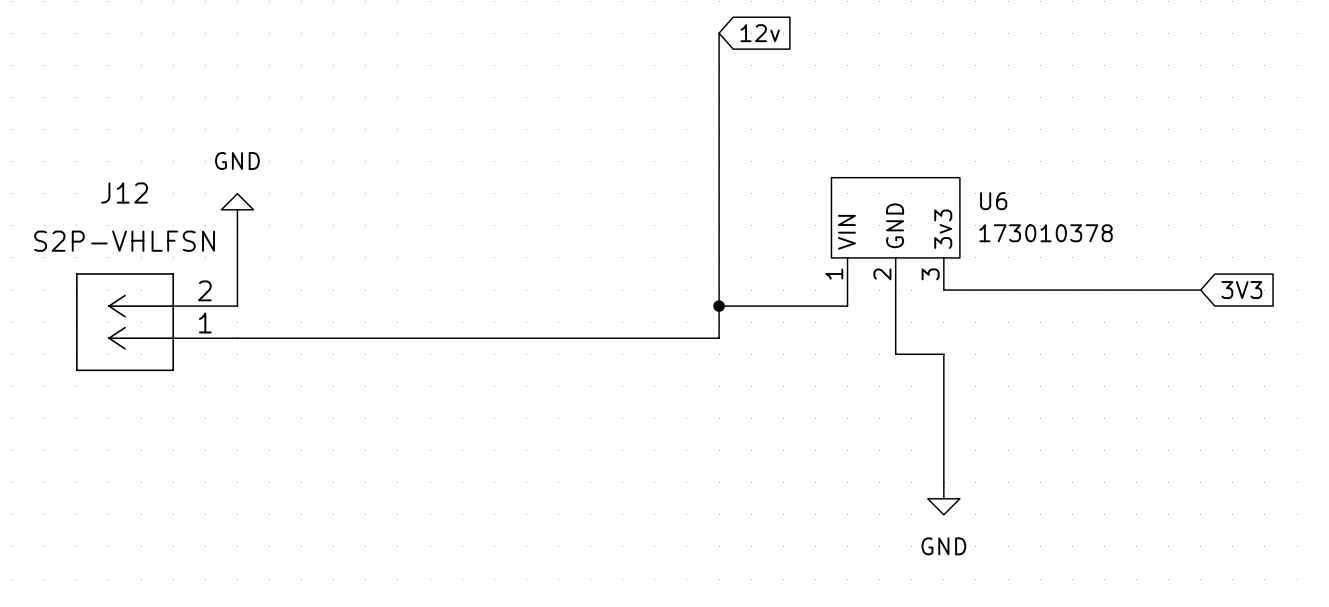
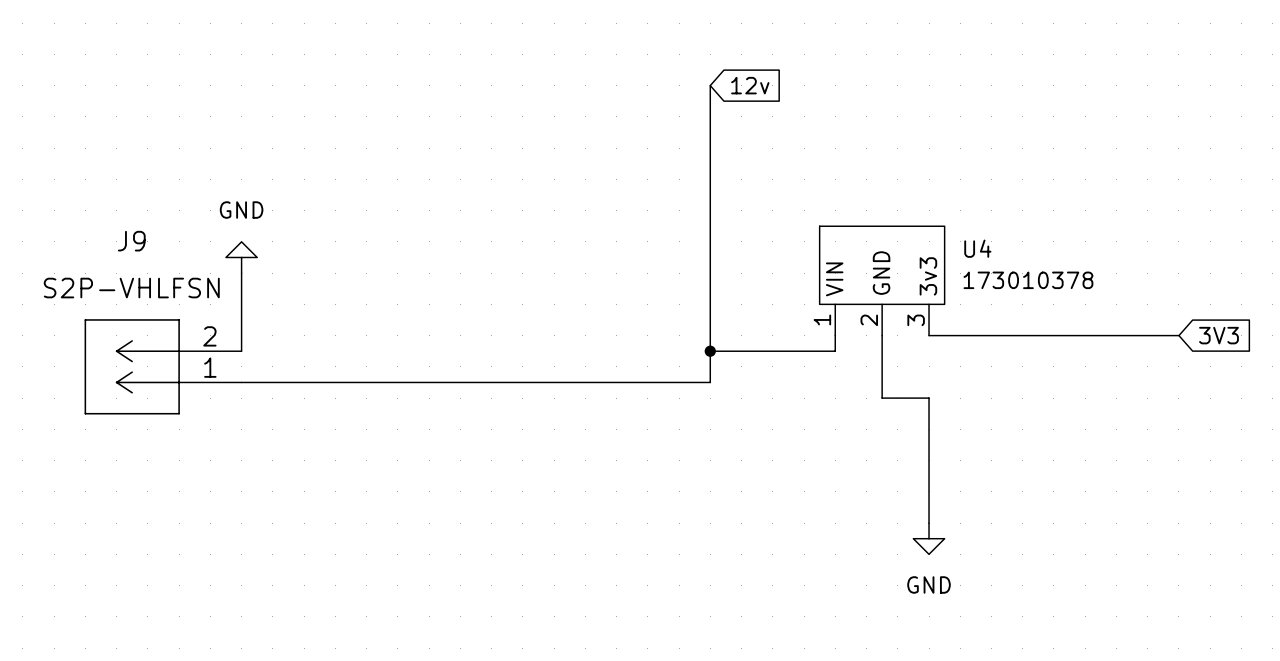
J12 name: J12 (124, 193) -> J9 (131, 241)
U6 name: U6 (993, 201) -> U4 (977, 248)

